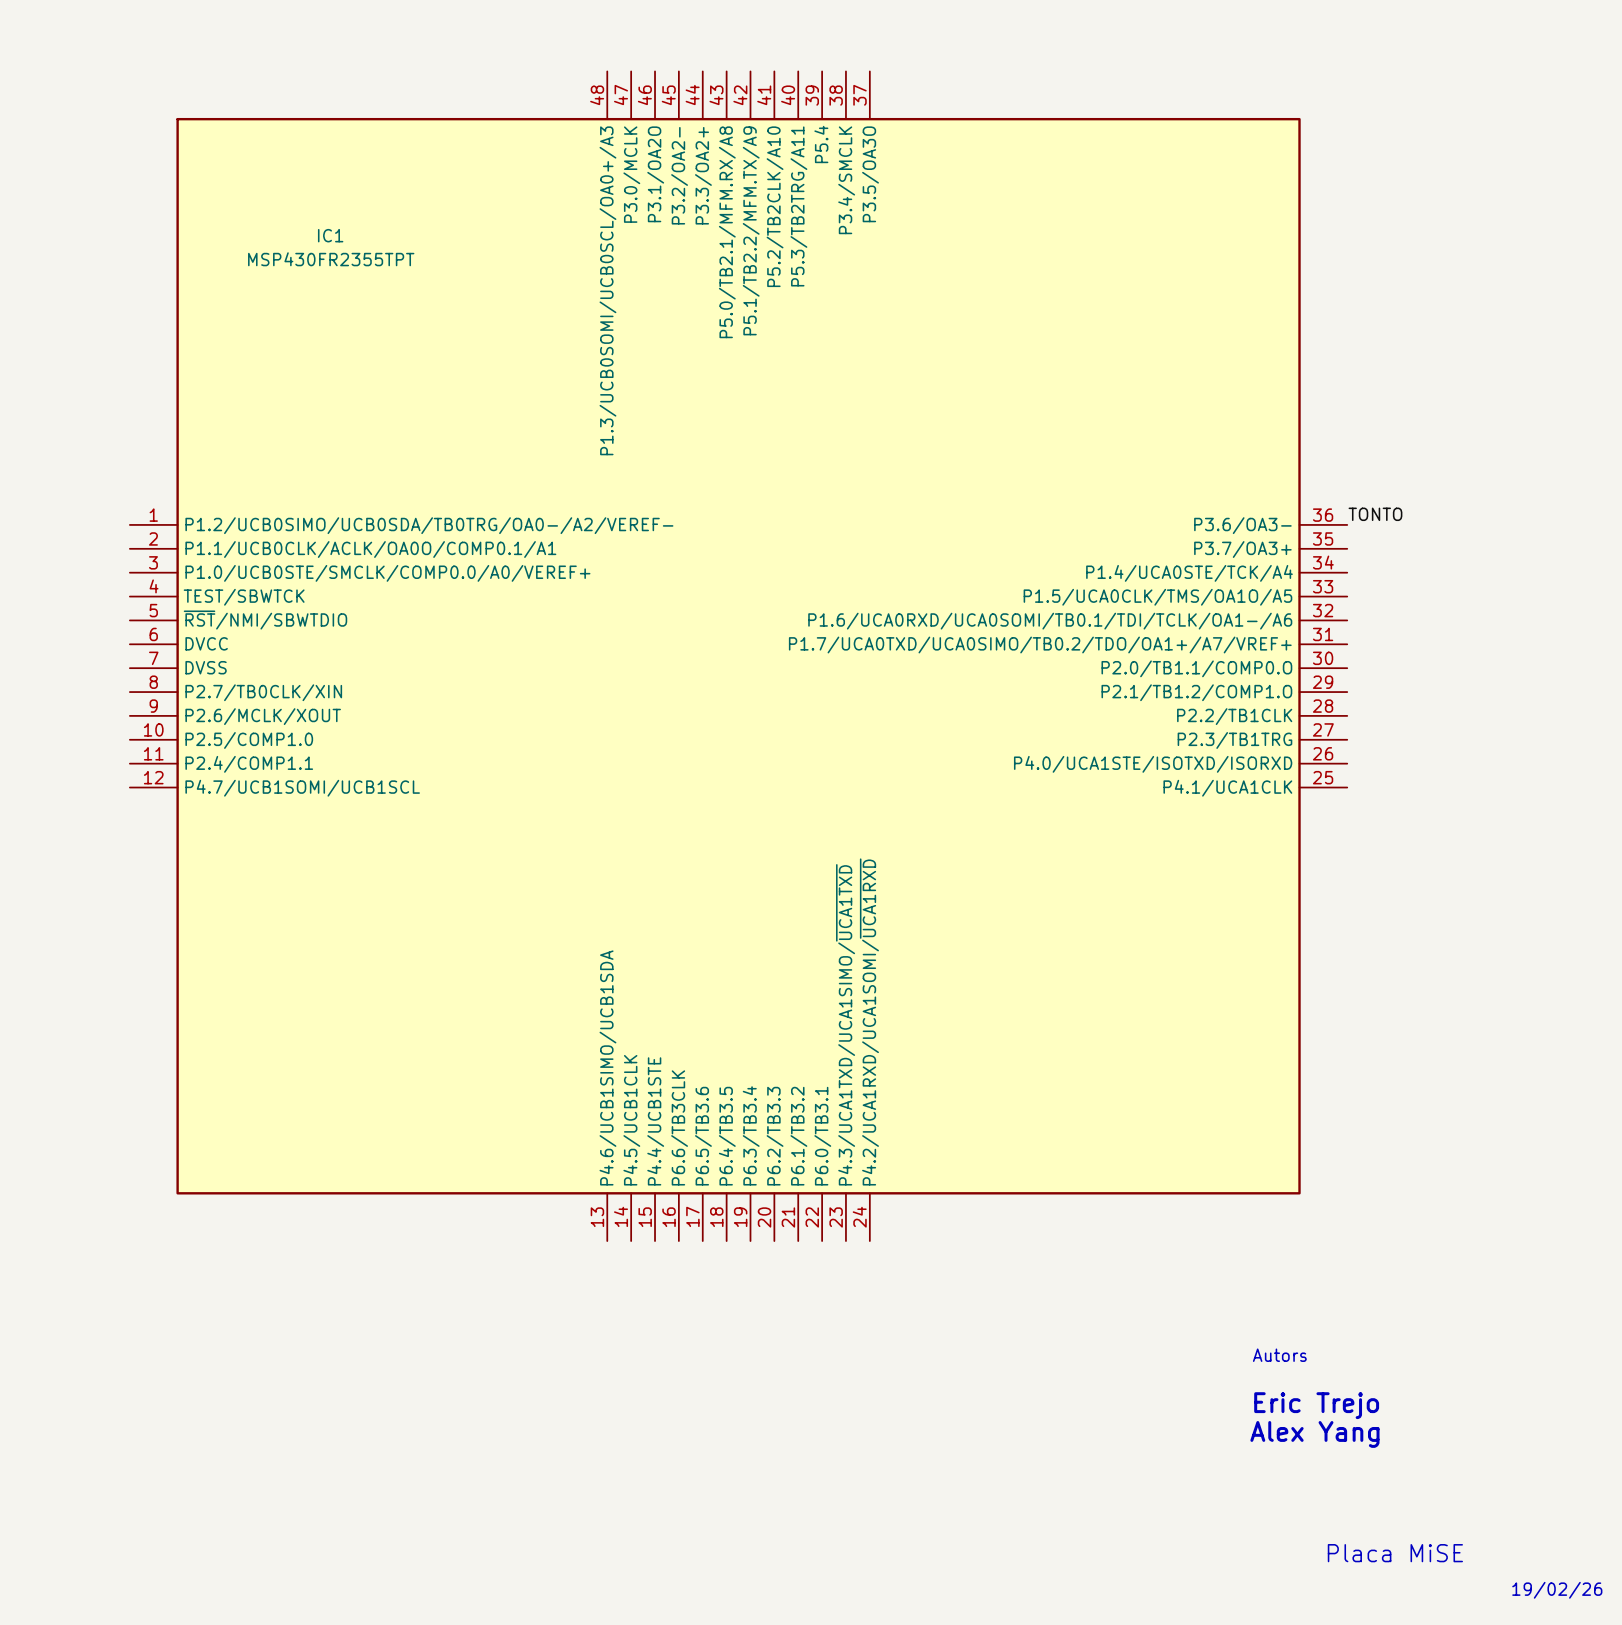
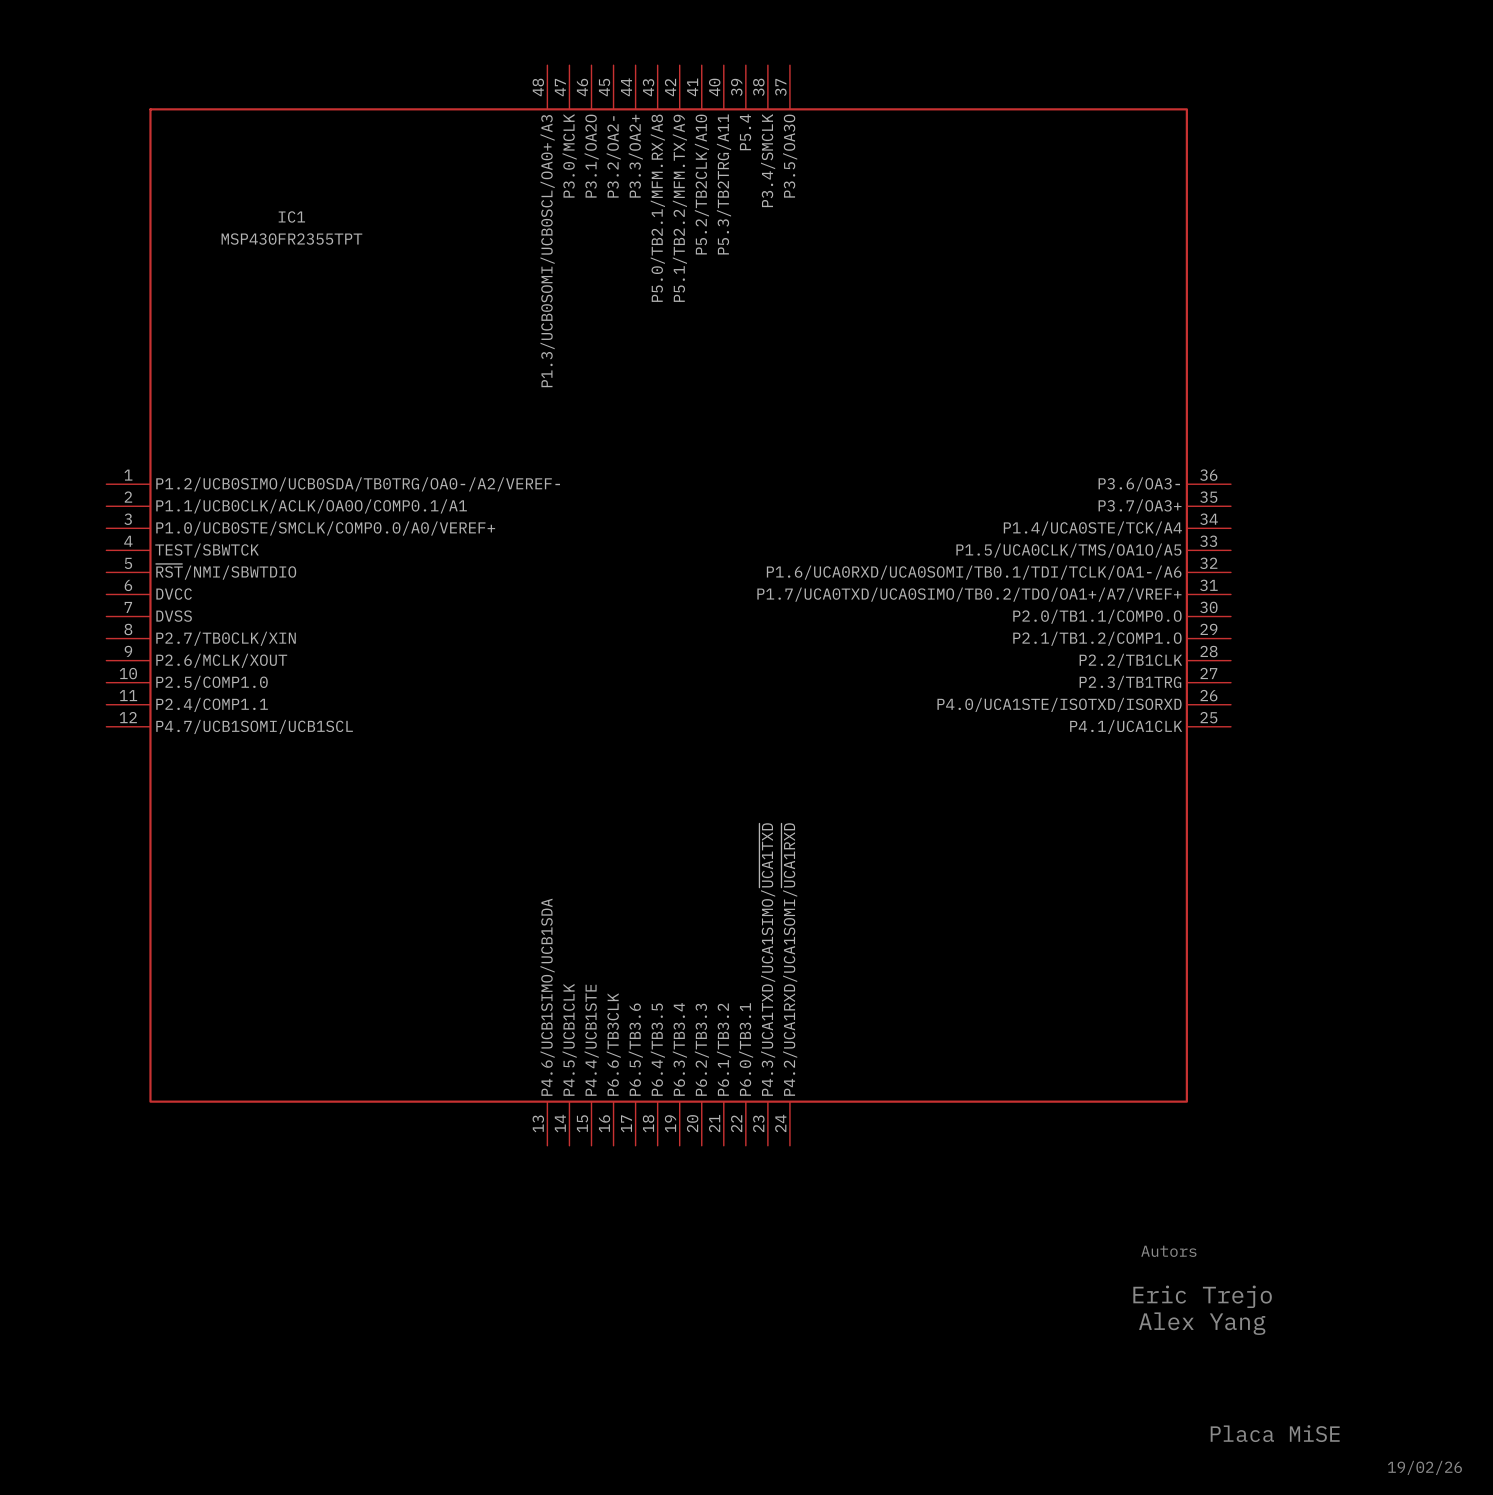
label: TONTO (1375, 514) -> none

